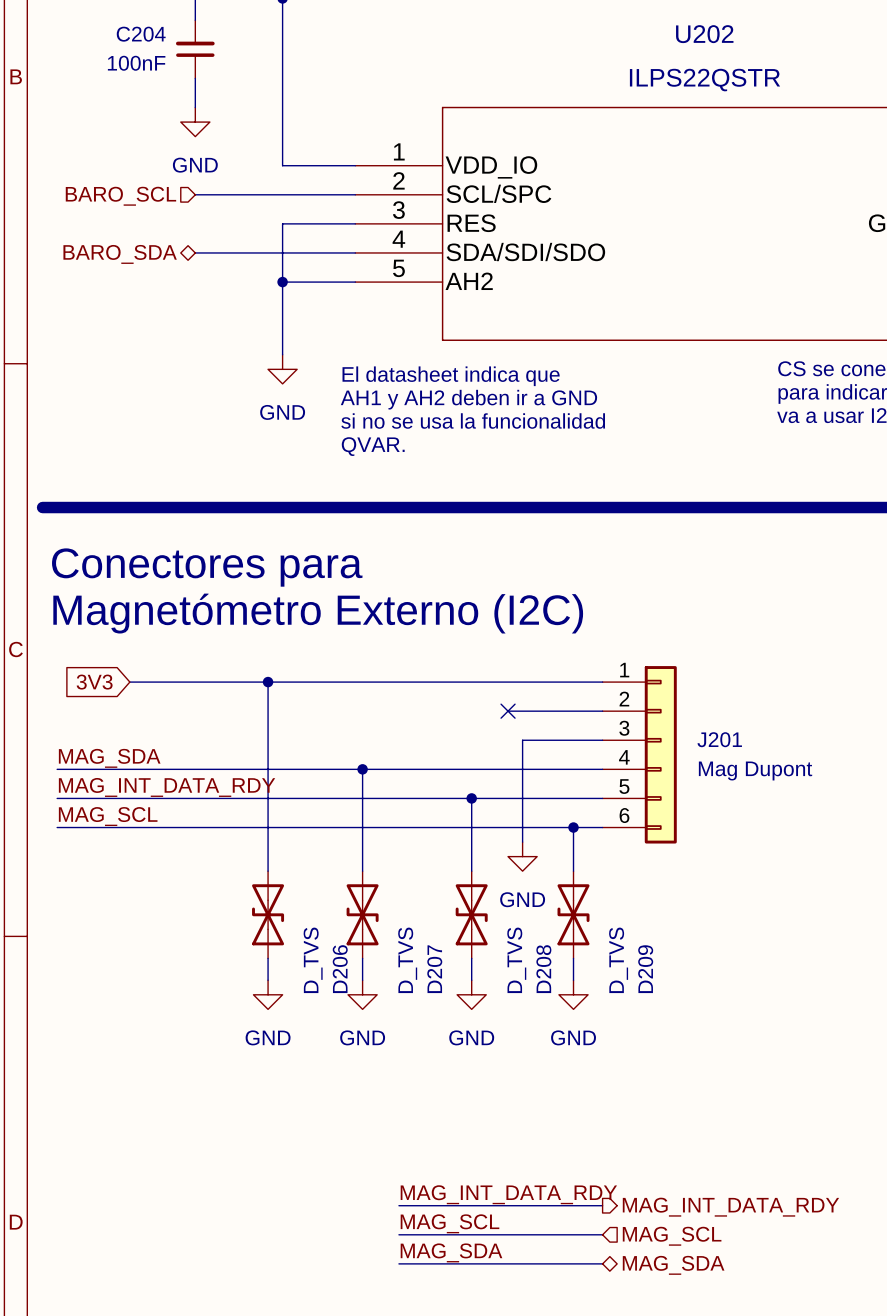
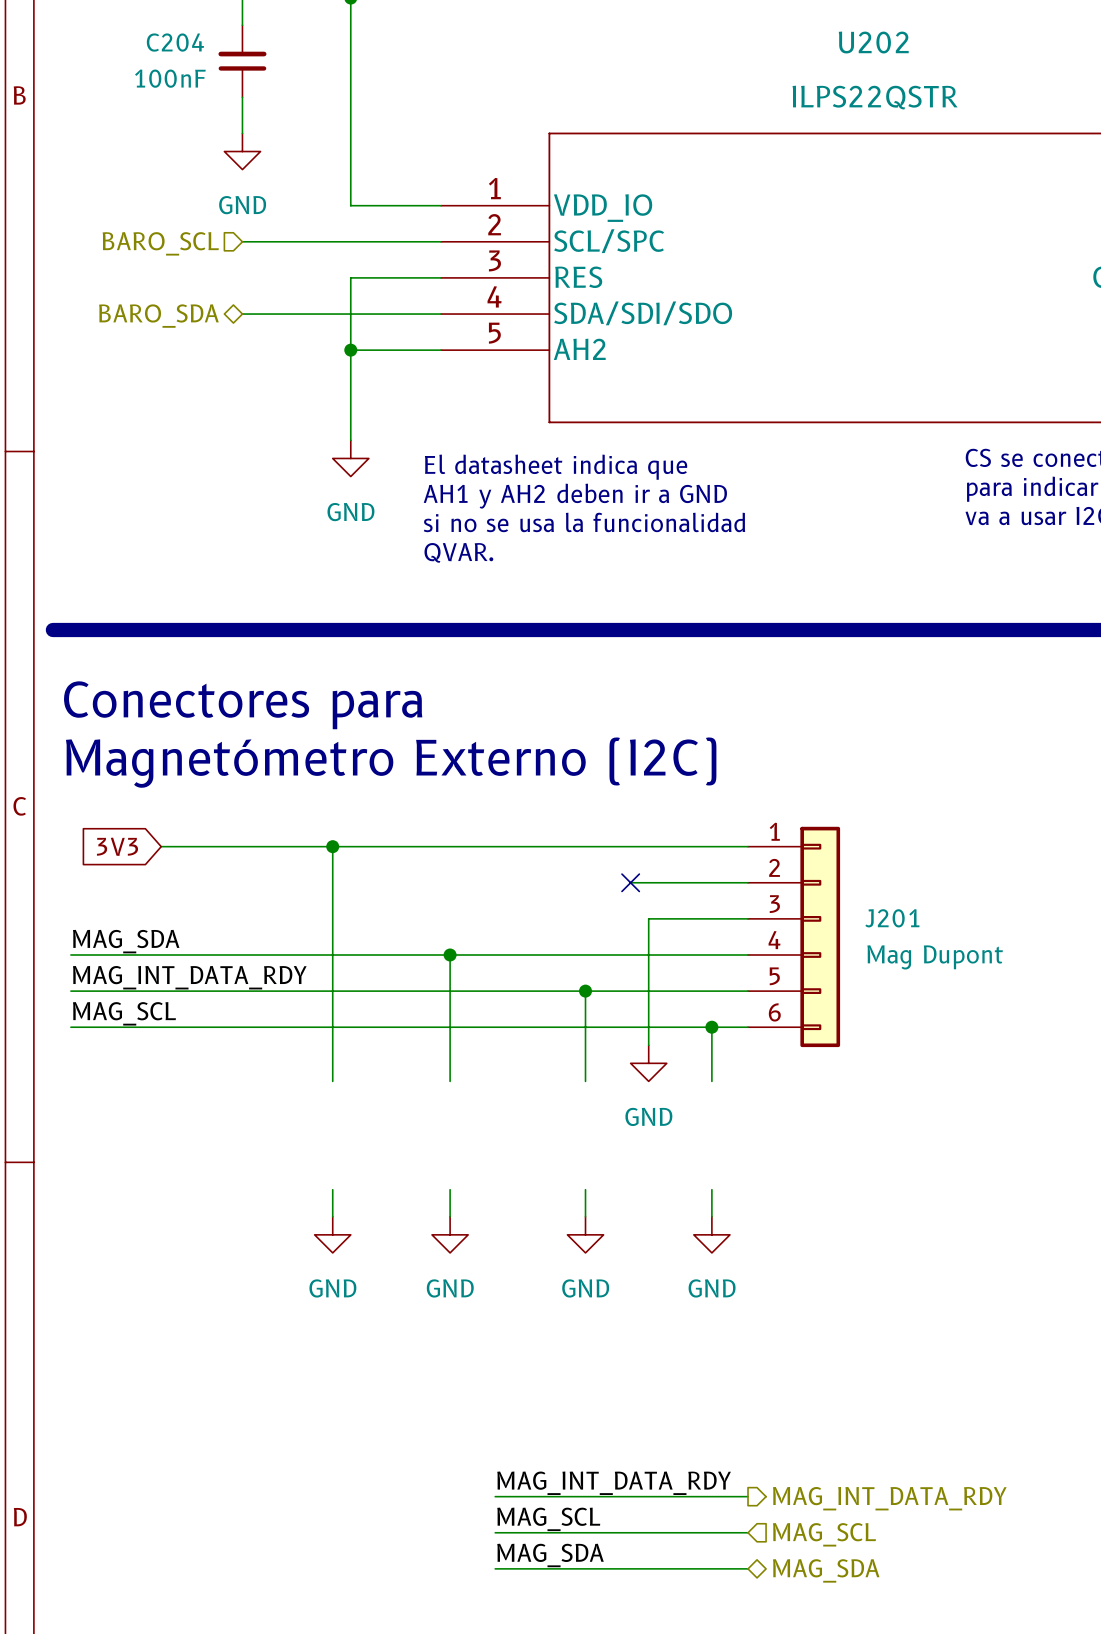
D206: D_TVS (268, 914) -> none
D207: D_TVS (362, 914) -> none
D208: D_TVS (471, 914) -> none
D209: D_TVS (573, 914) -> none

